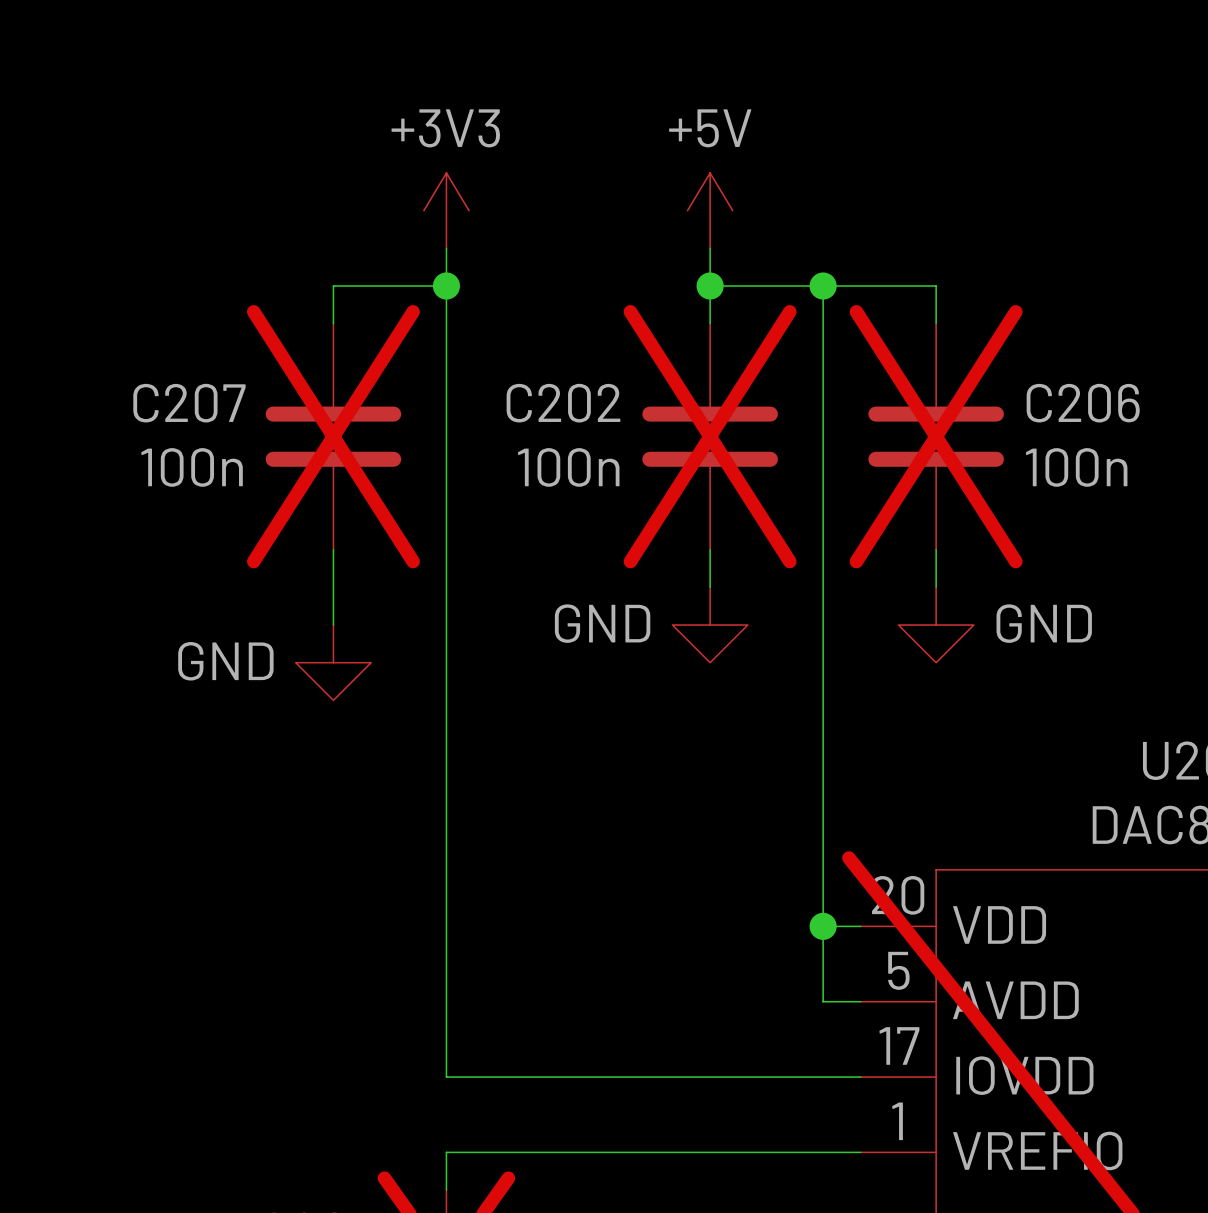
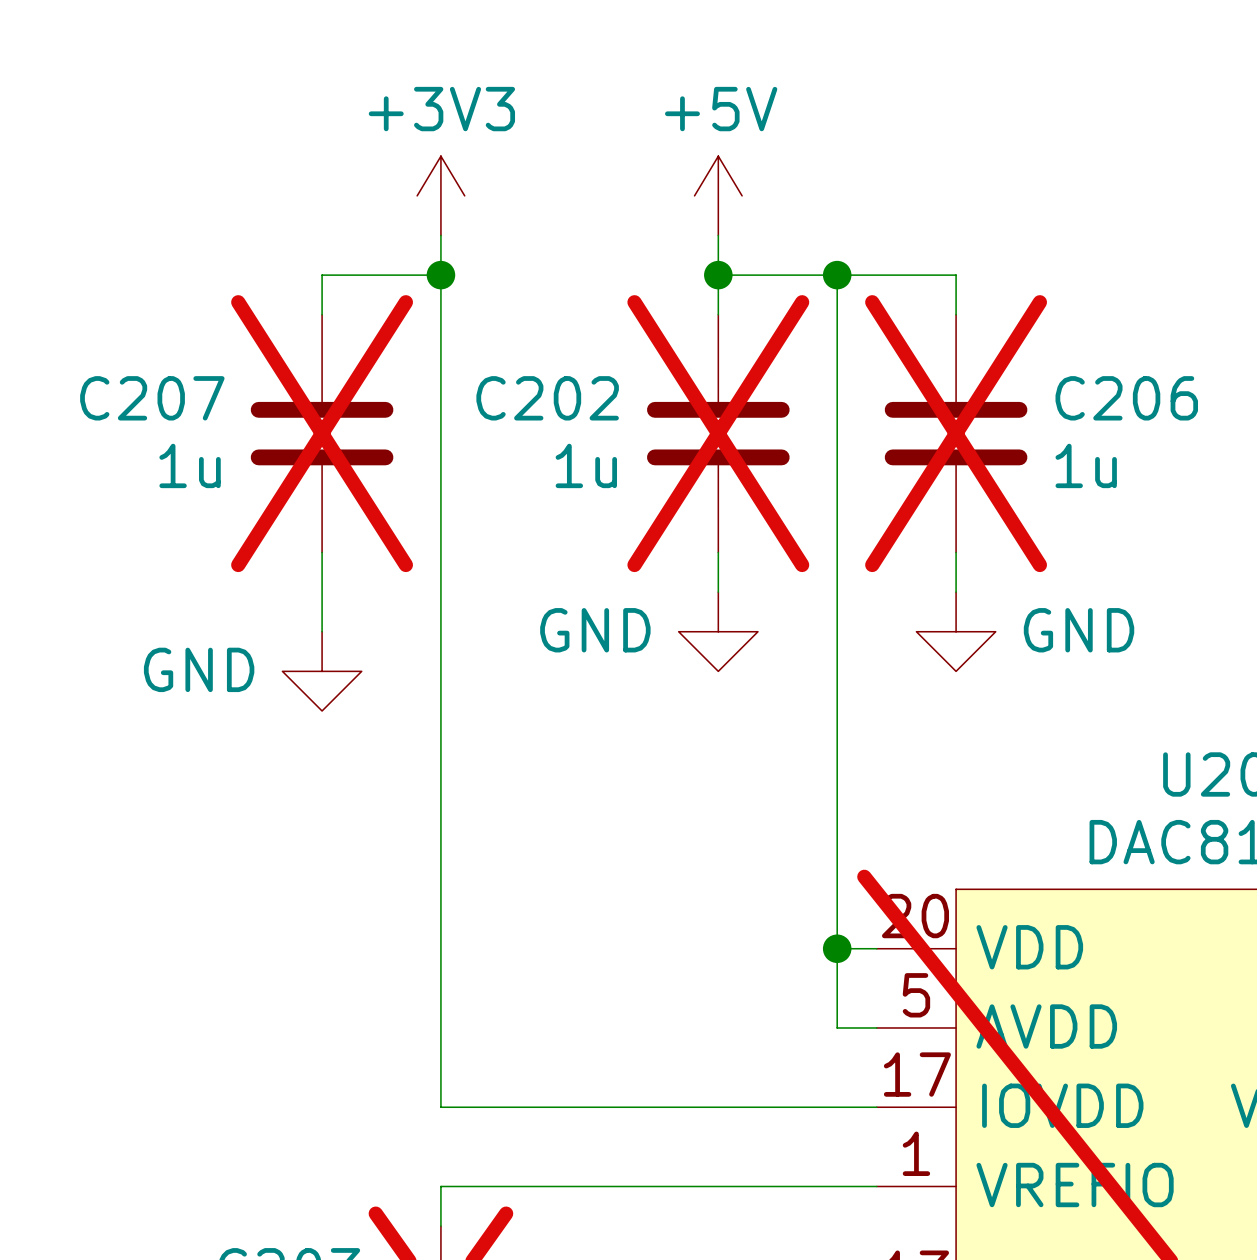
C207 value: 100n (192, 467) -> 1u (190, 465)
C202 value: 100n (568, 467) -> 1u (586, 465)
C206 value: 100n (1076, 467) -> 1u (1086, 465)

